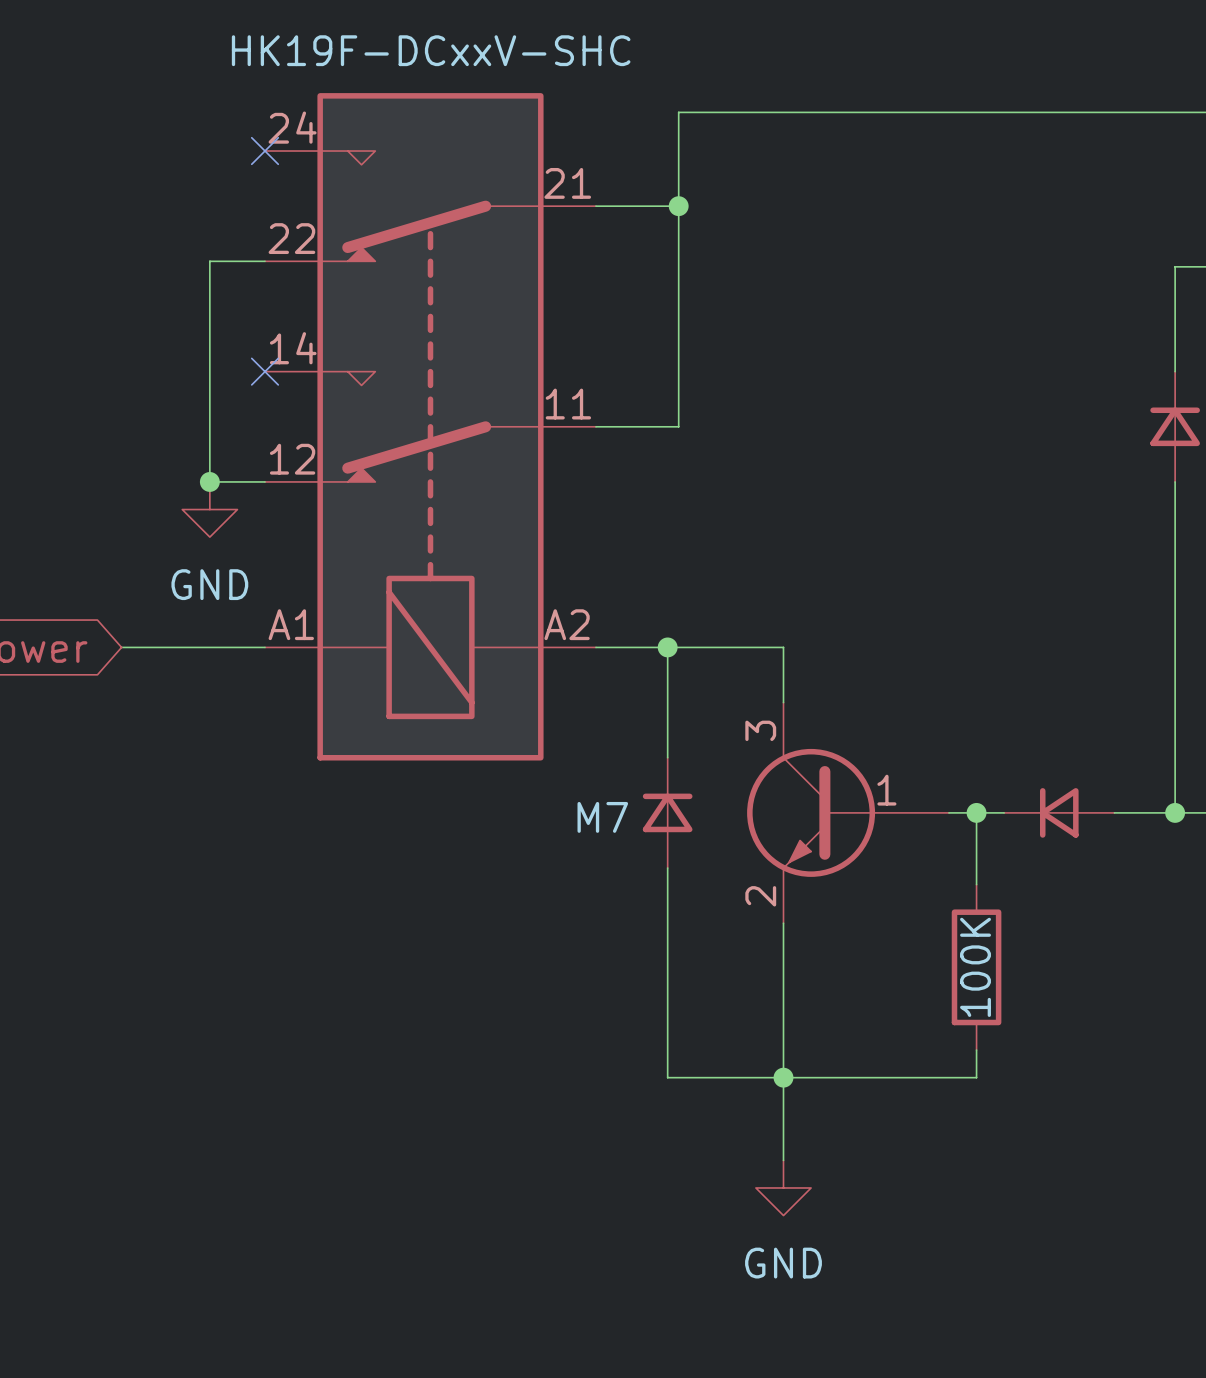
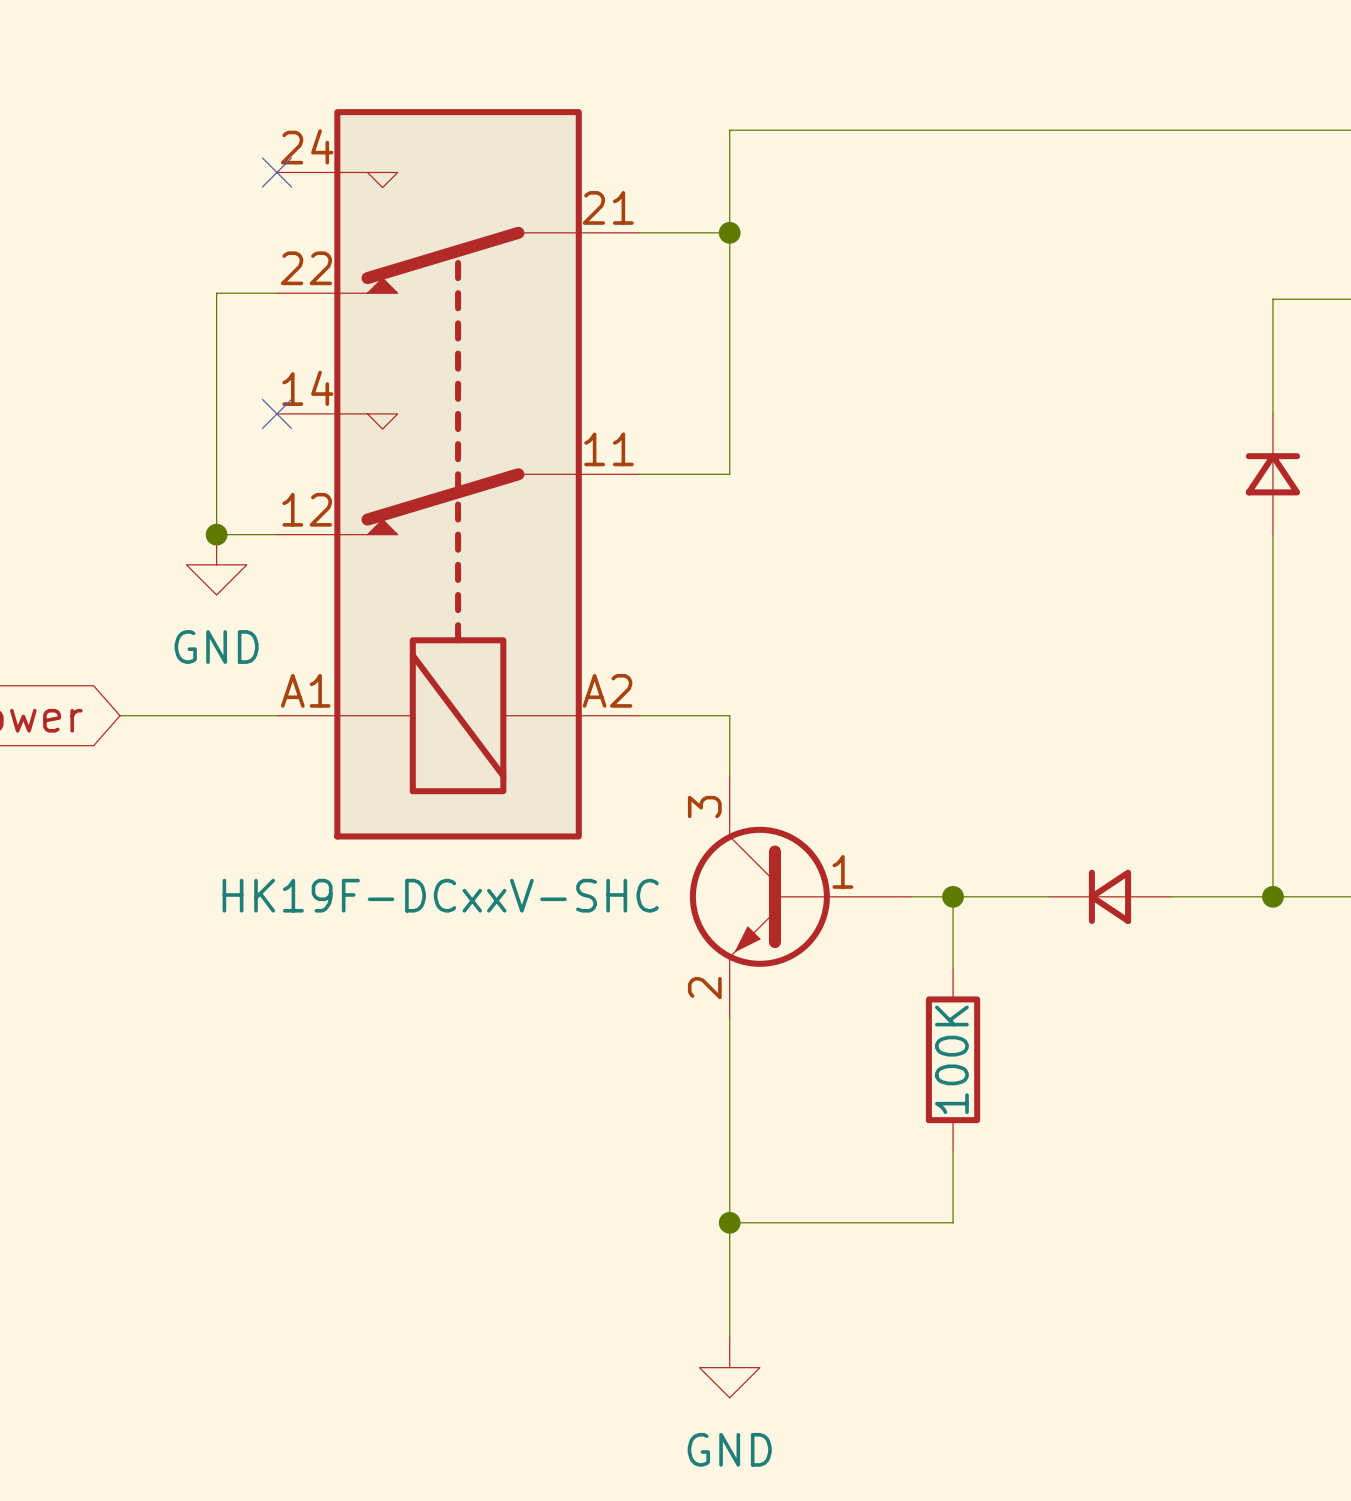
part value position: HK19F-DCxxV-SHC (431, 50) -> HK19F-DCxxV-SHC (440, 895)
wire: (667, 647) (667, 757) -> none
junction: (667, 647) -> none
wire: (678, 647) (783, 647) (783, 702) -> (729, 715) (729, 776)
part: M7 (667, 812) -> none
part position: (848, 812) -> (800, 896)
wire: none -> (953, 896) (953, 969)
wire: (976, 812) (976, 884) -> none
junction position: (976, 812) -> (953, 896)
part position: (1059, 812) -> (1109, 896)
wire: (667, 868) (667, 1077) (976, 1077) (976, 1050) -> none
wire: none -> (729, 1017) (729, 1337)
wire: (783, 923) (783, 1160) -> none
part position: (976, 967) -> (953, 1059)
wire: none -> (953, 1150) (953, 1222) (729, 1222)
junction position: (783, 1077) -> (729, 1222)
power symbol position: GND (783, 1187) -> GND (729, 1367)

